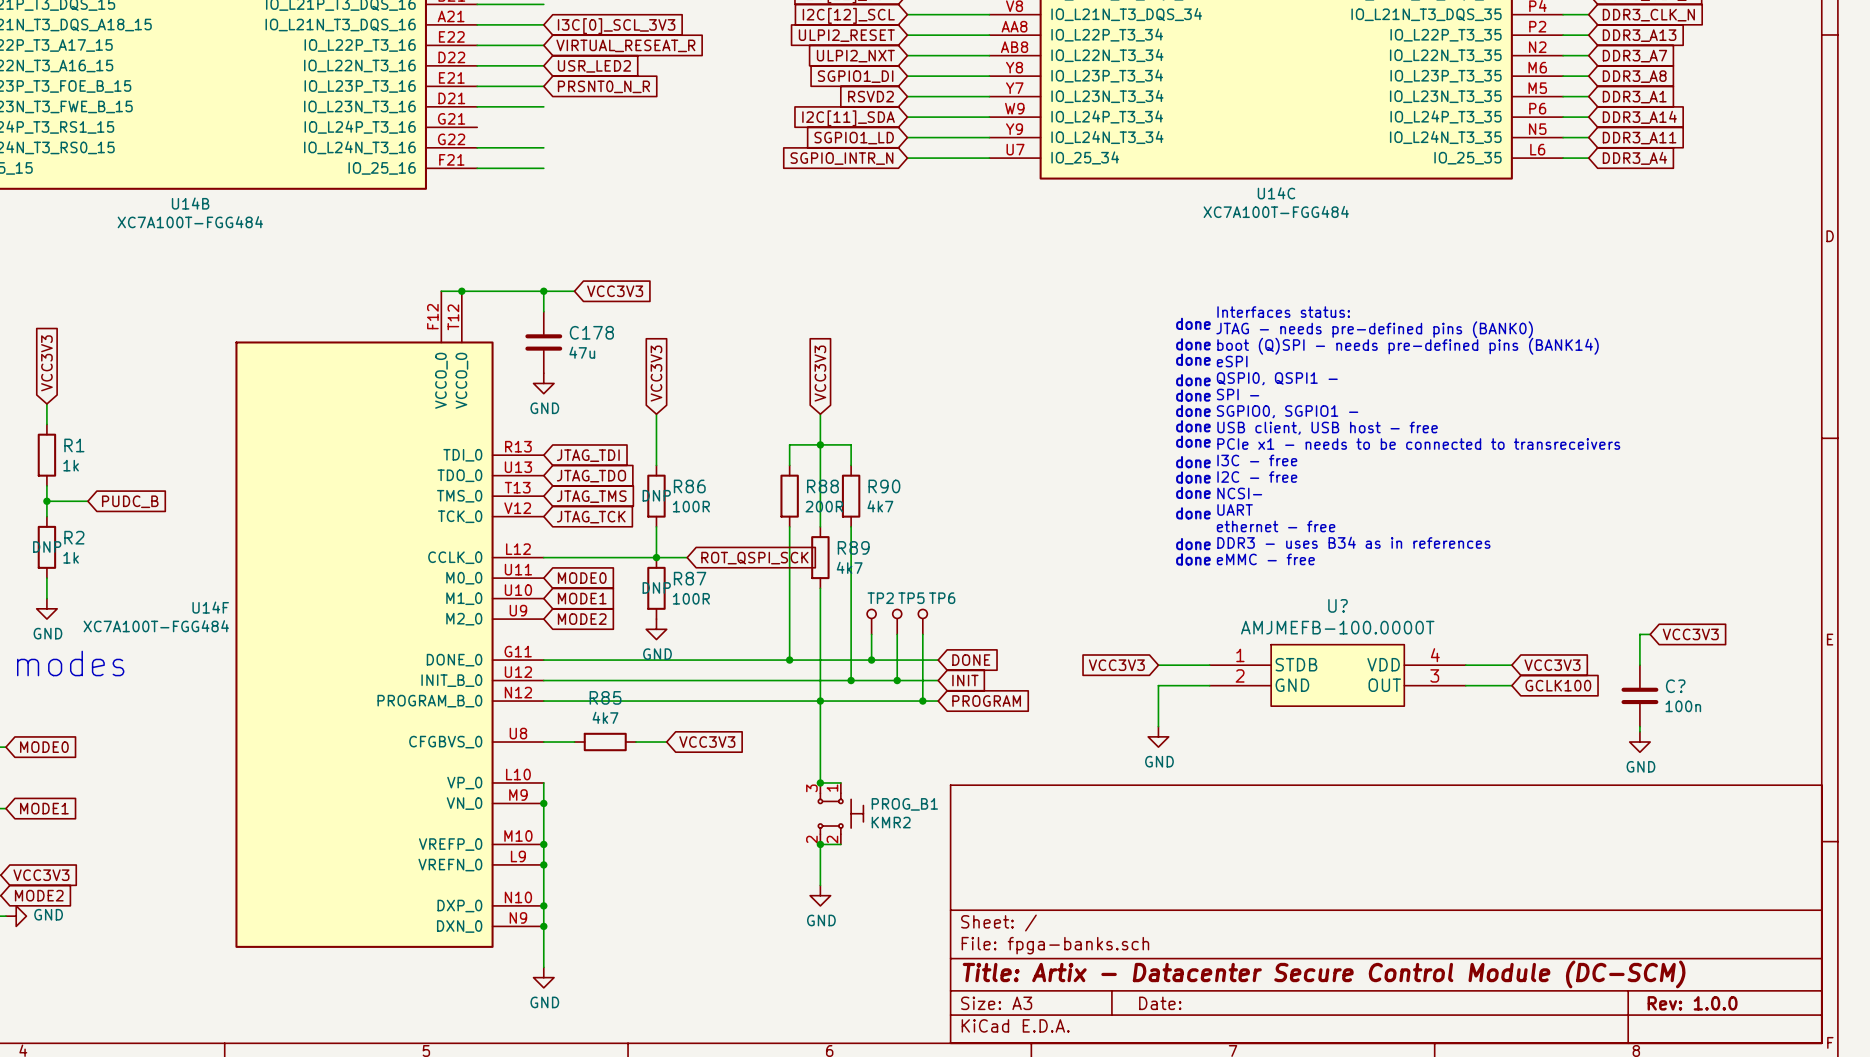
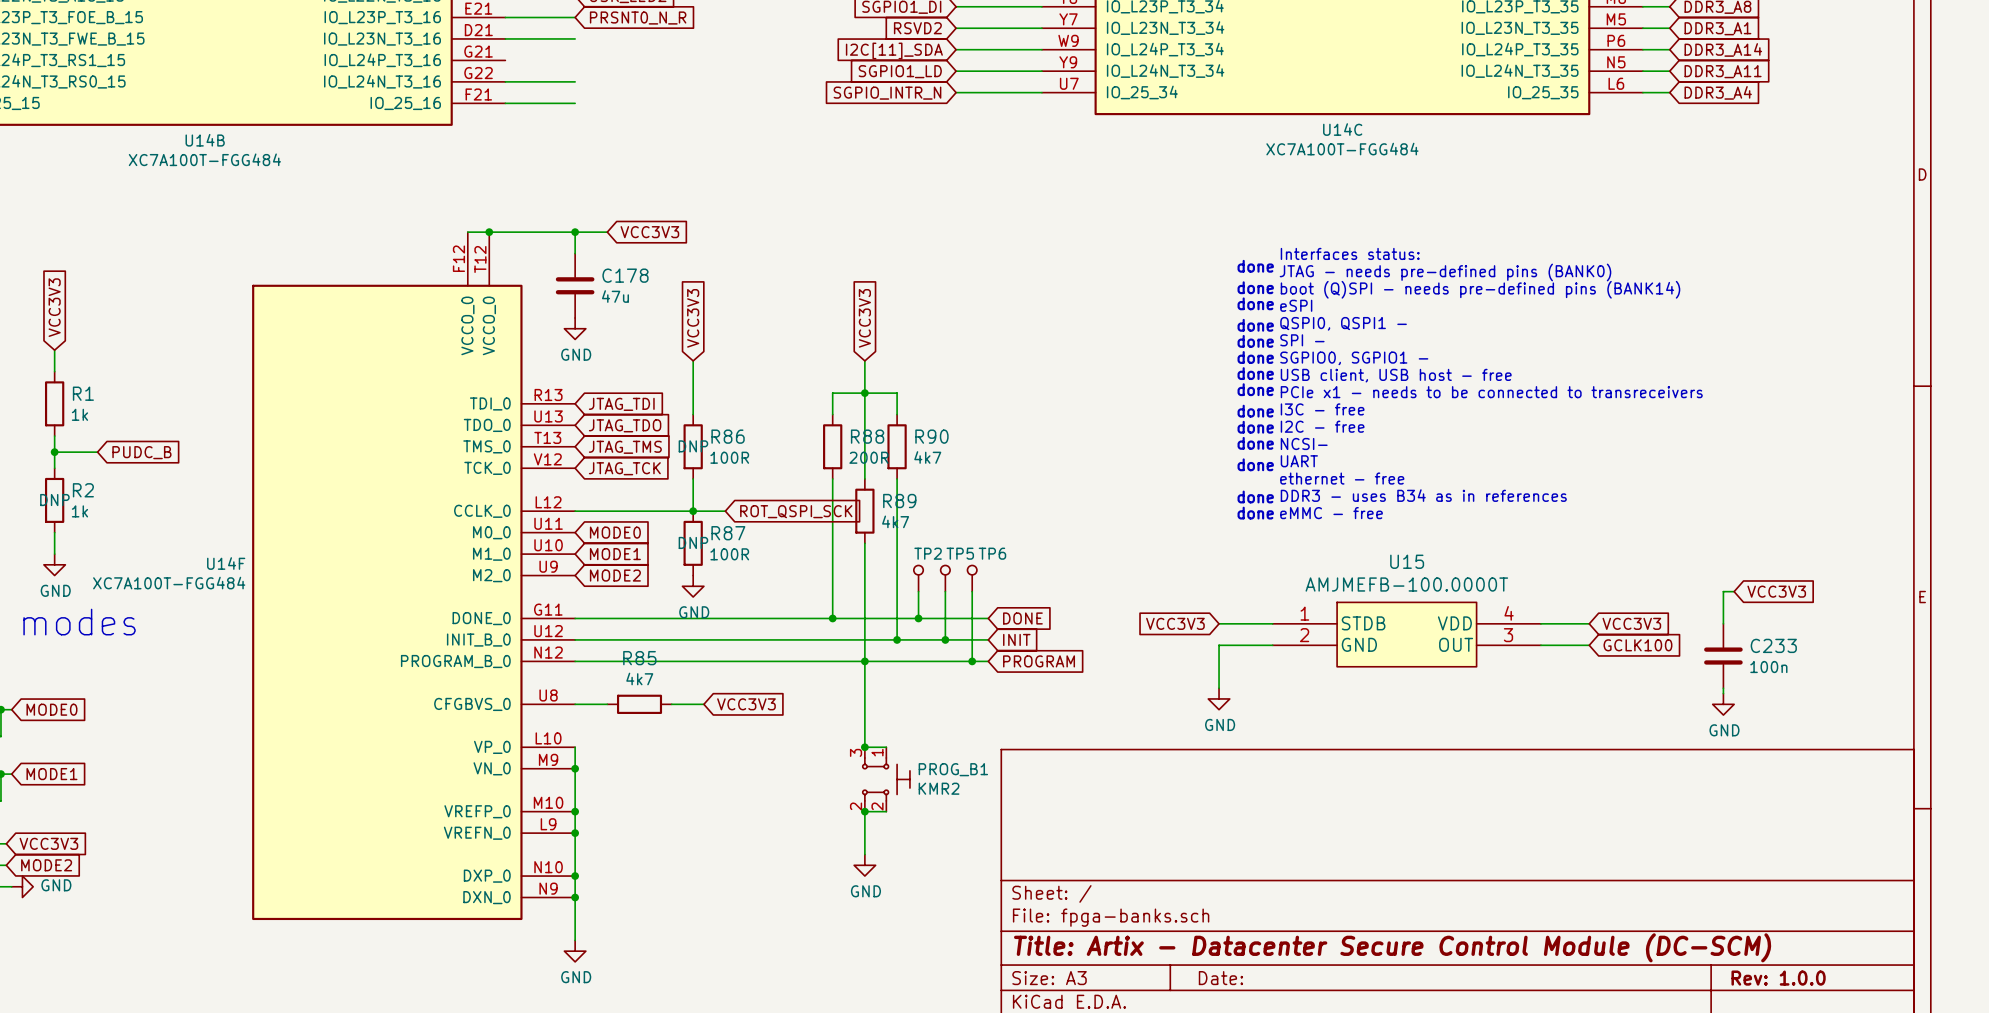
U? name: U? (1338, 605) -> U15 (1407, 561)
C? name: C? (1675, 686) -> C233 (1773, 645)

